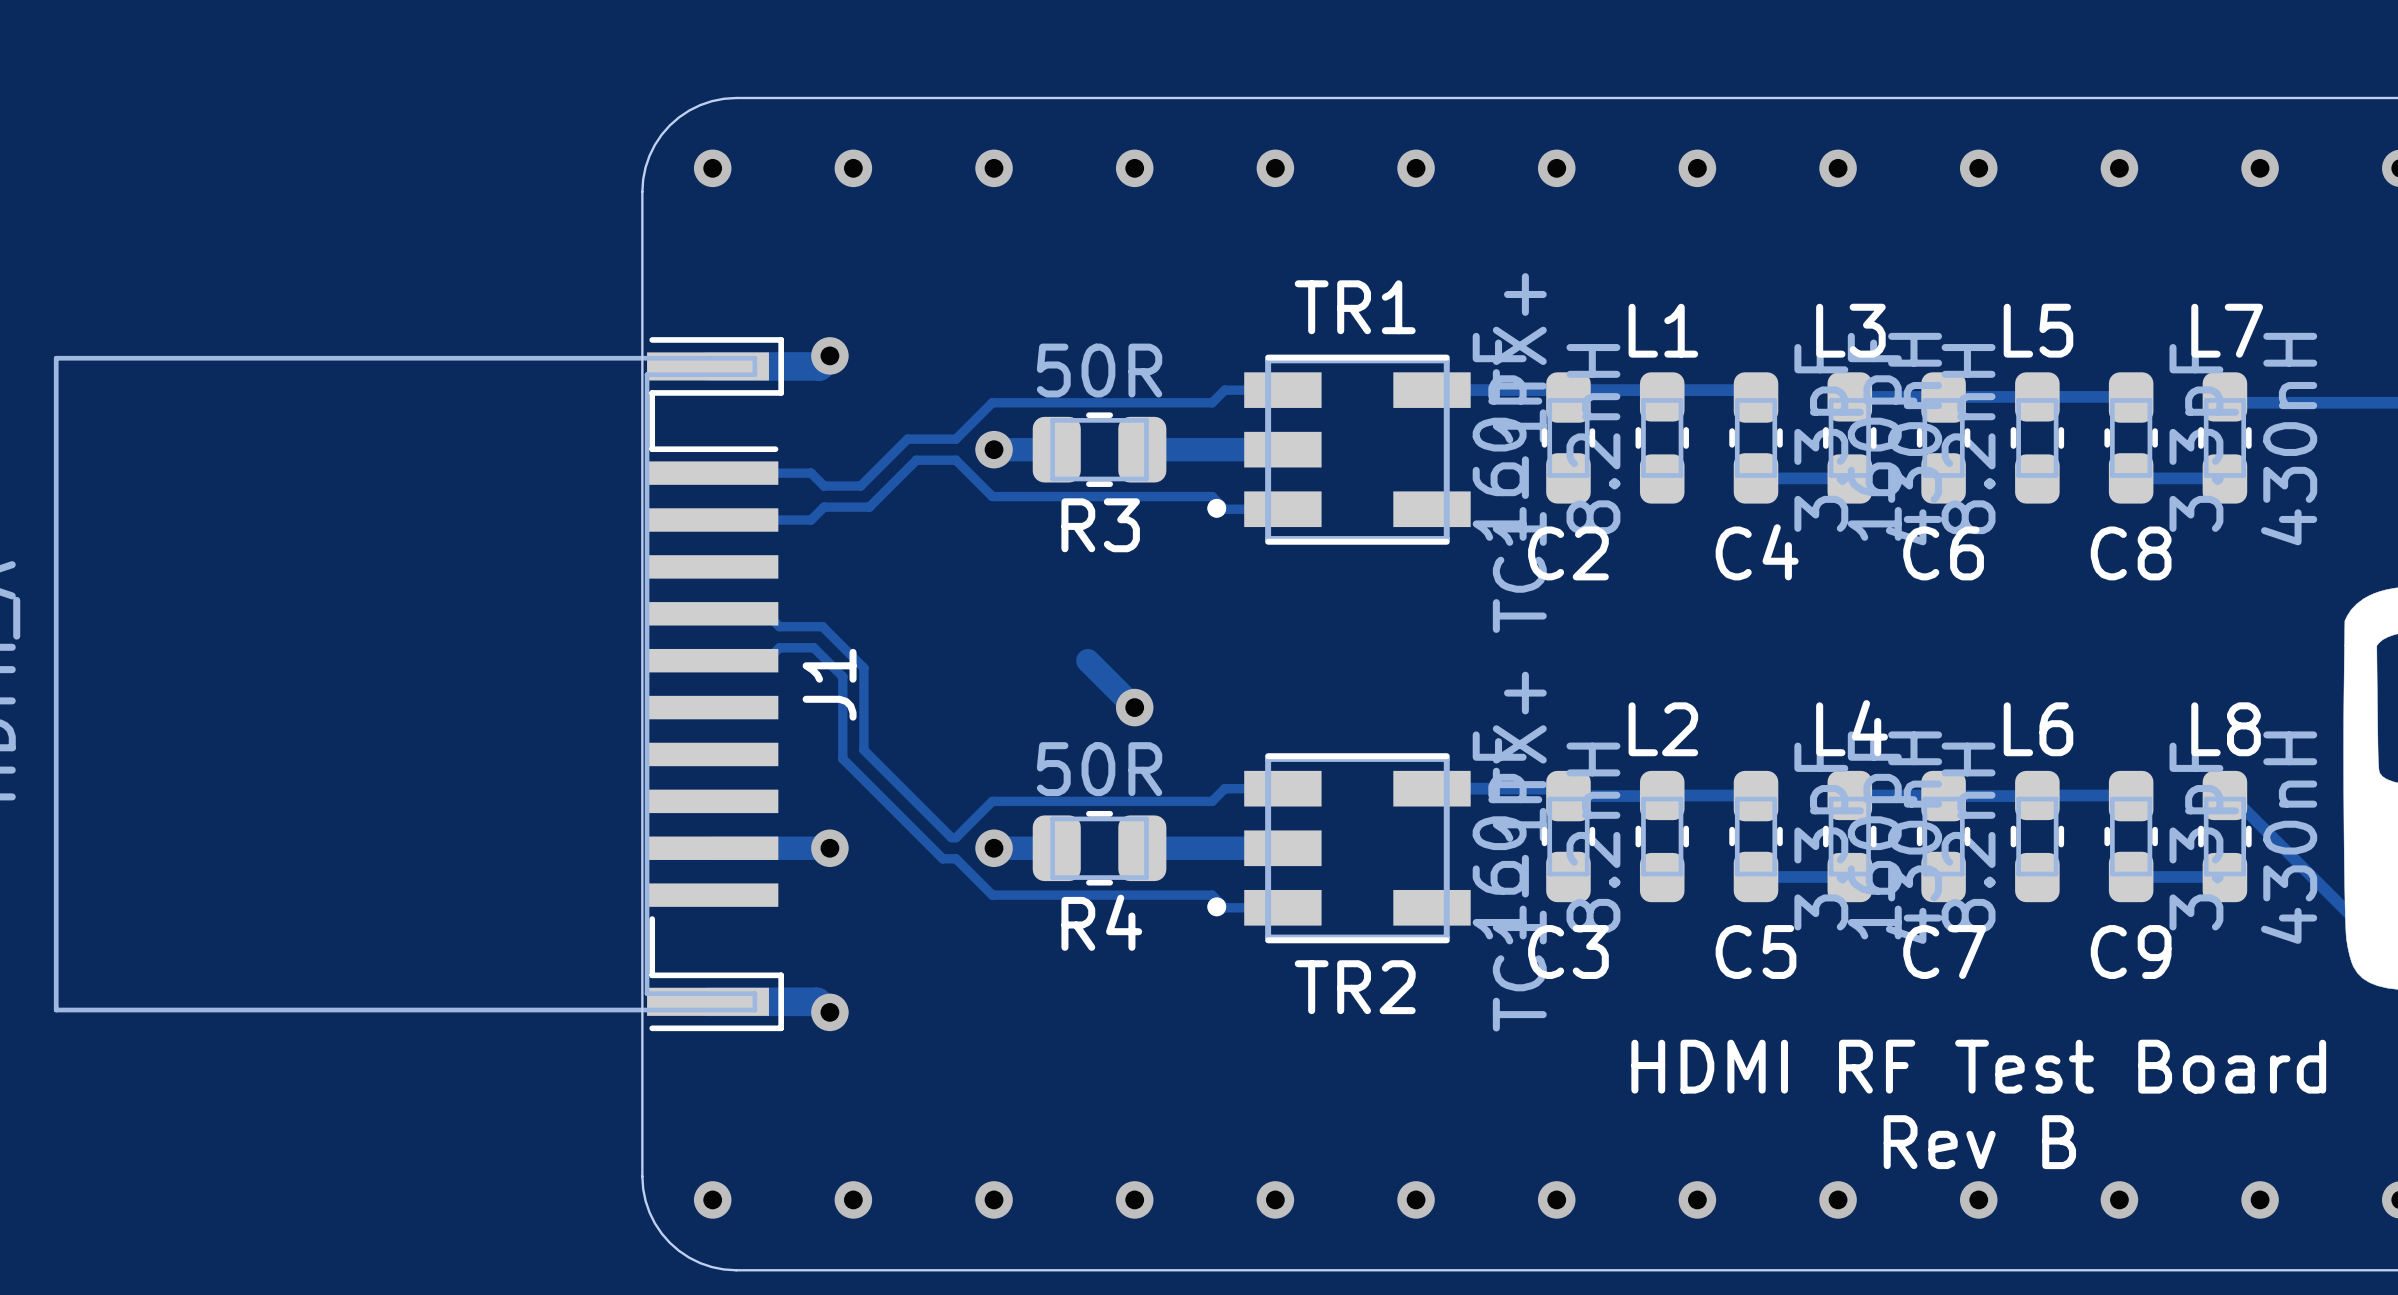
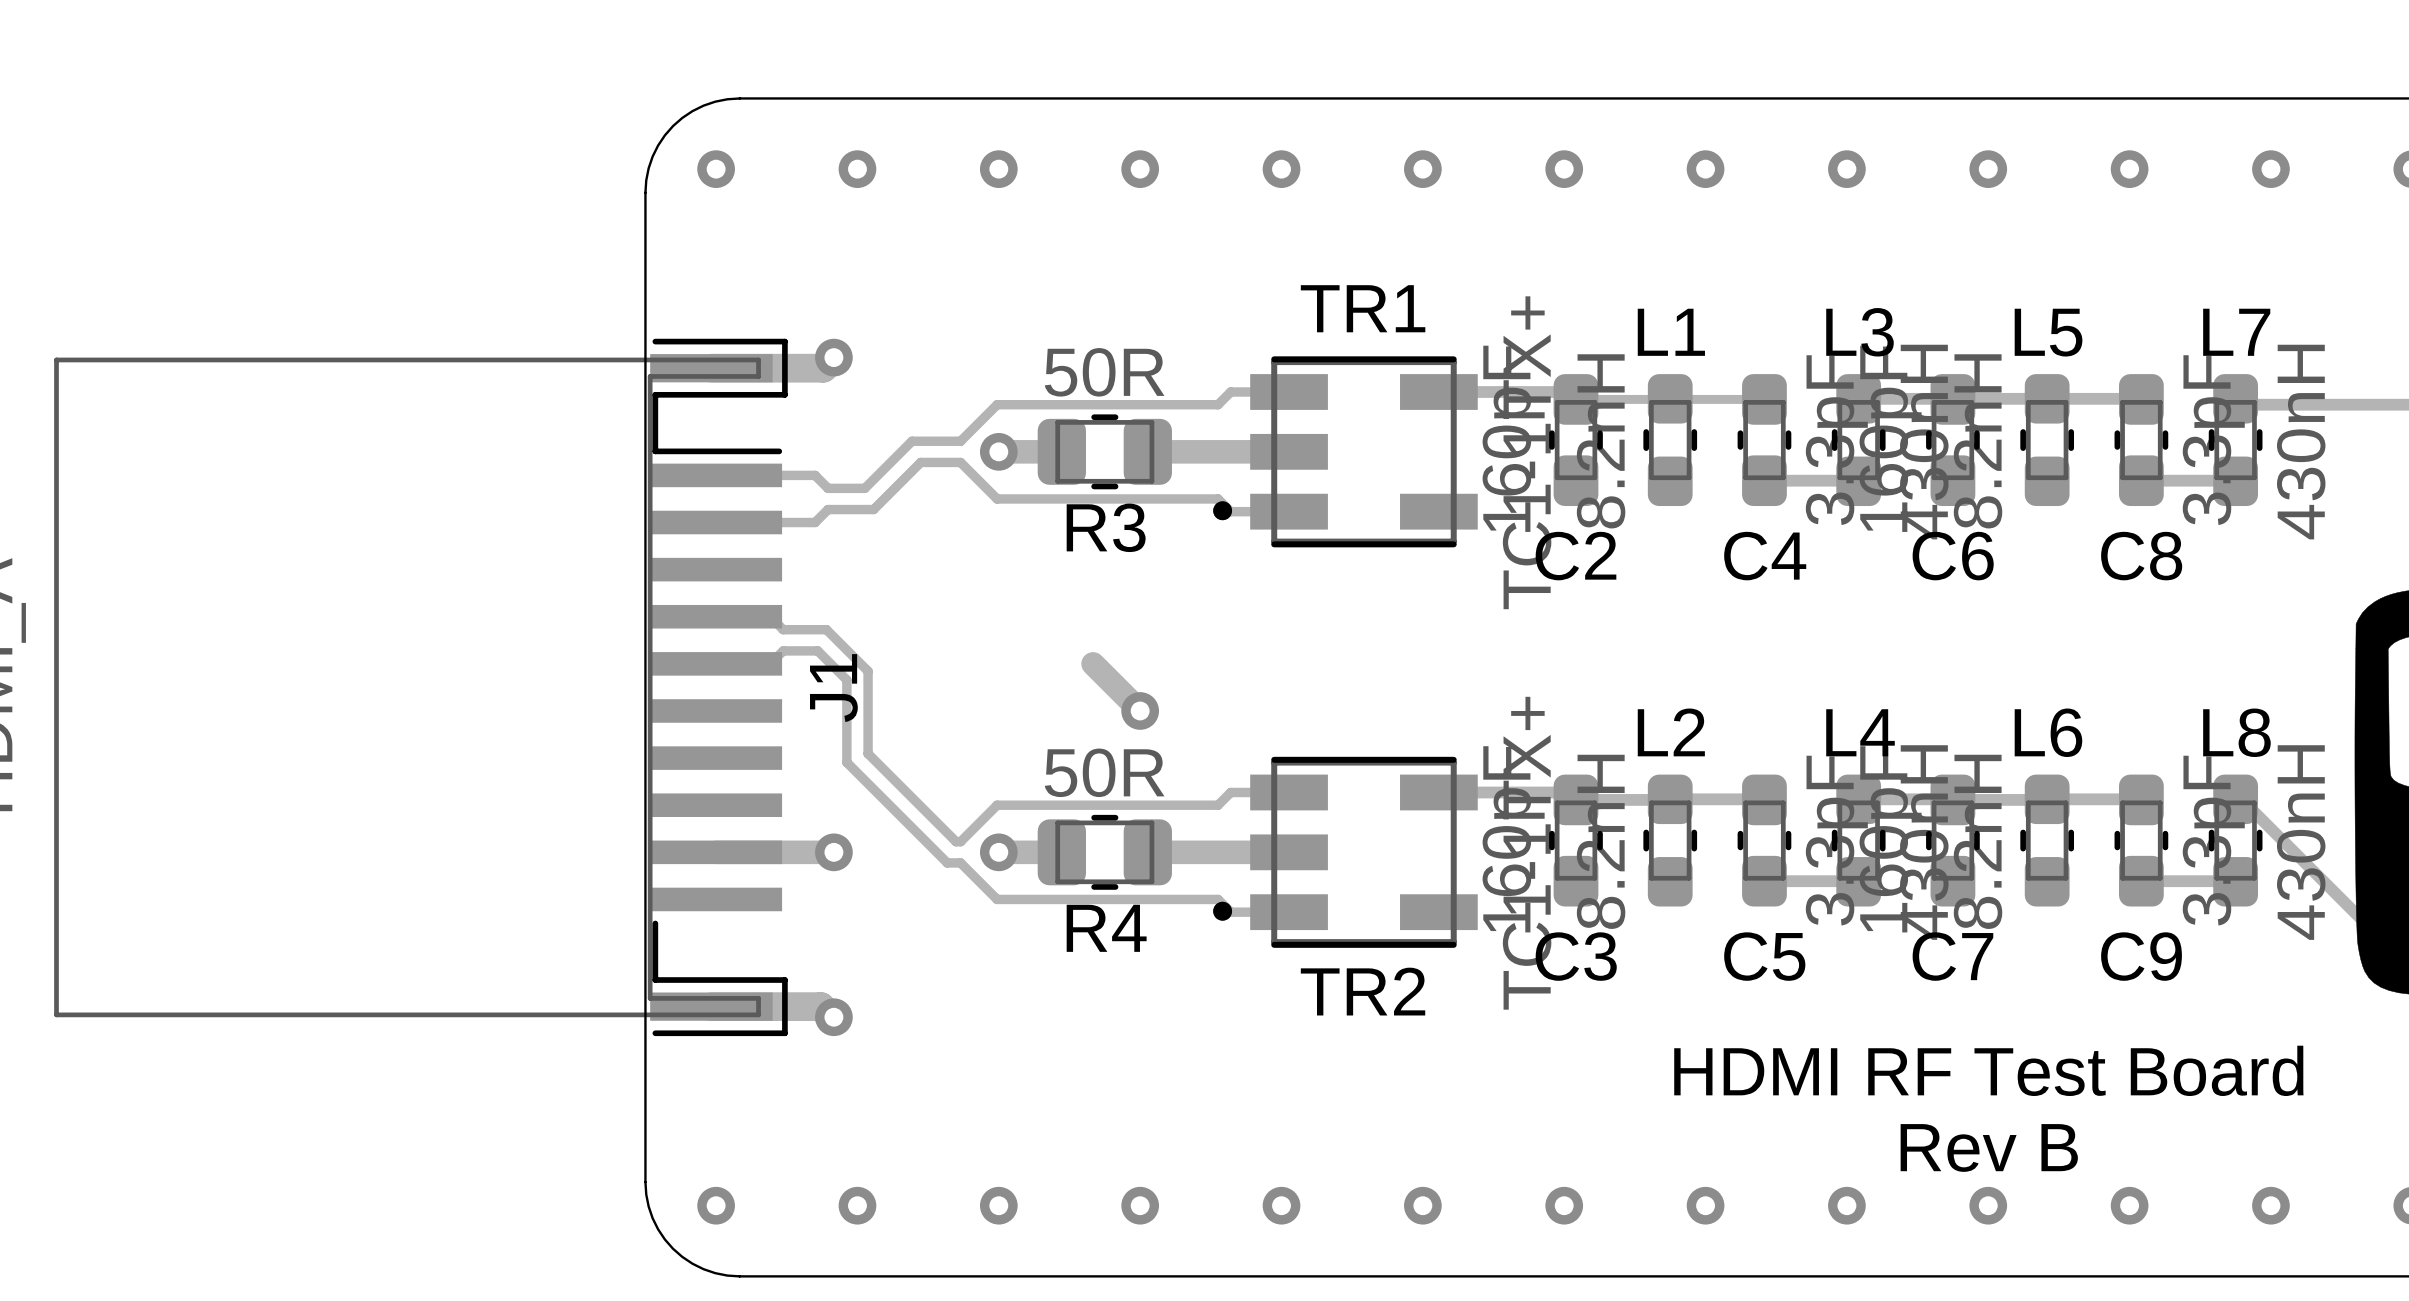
track: (1561, 390) (1748, 390) -> (1568, 392) (1575, 399) (1669, 399)
track: none -> (1670, 399) (1764, 399)

